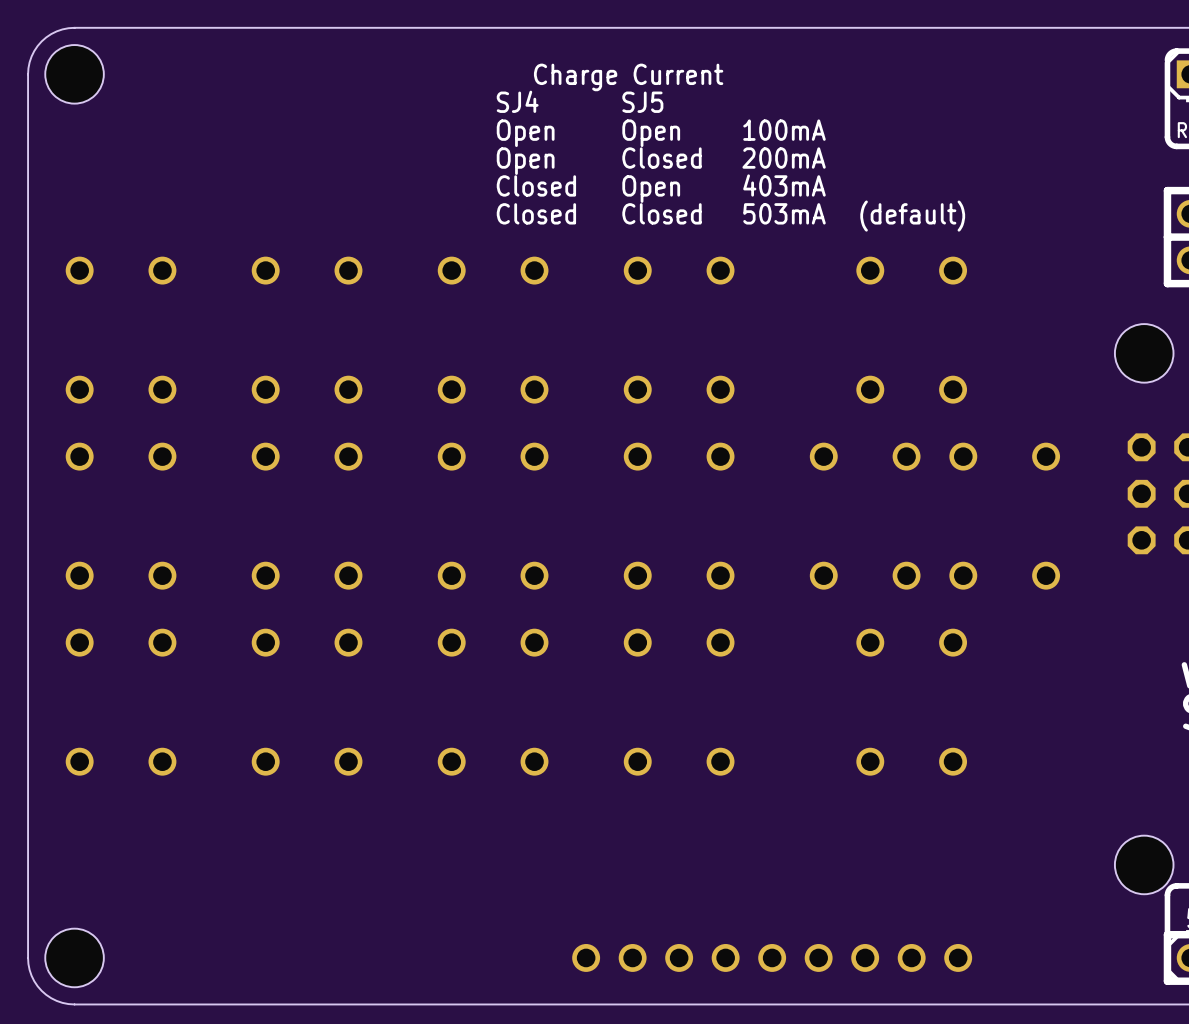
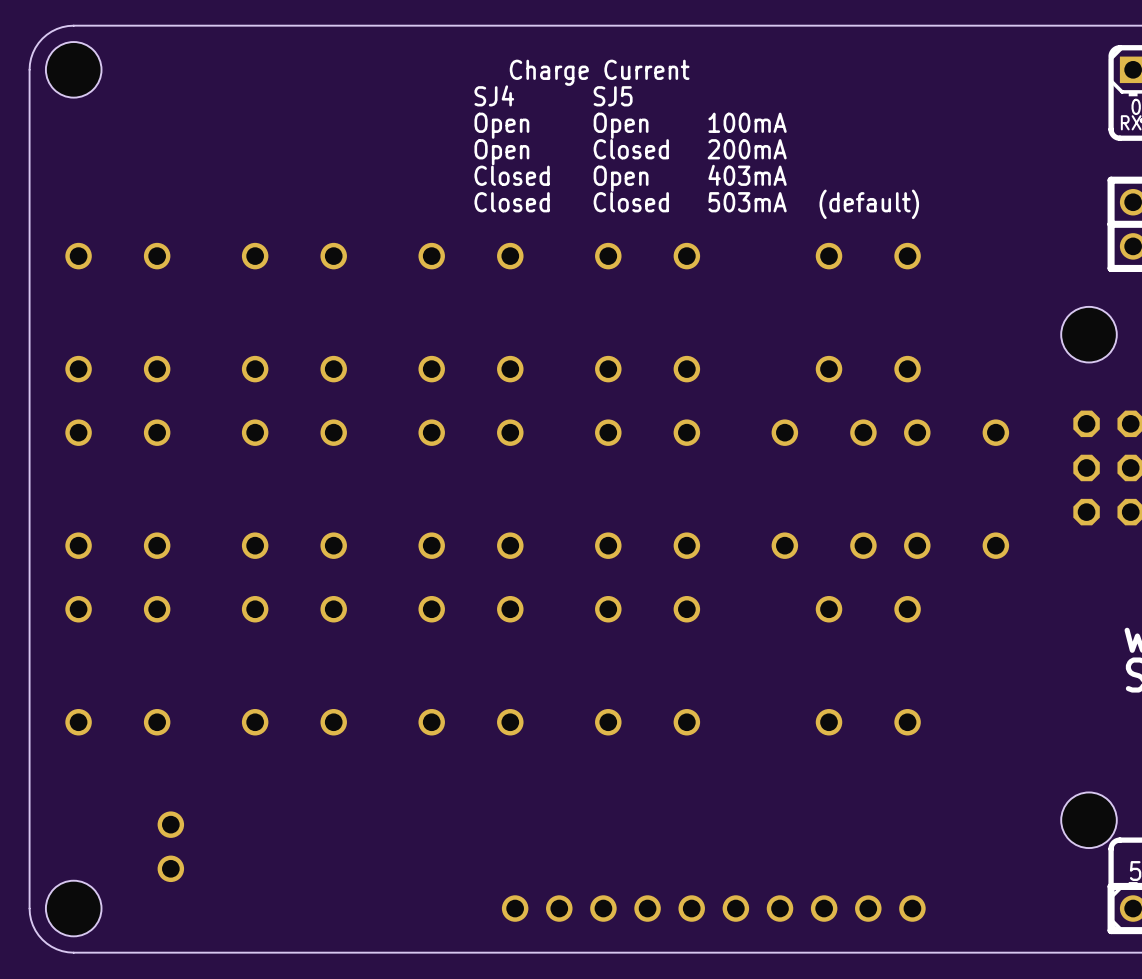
part: none -> (170, 846)
part: none -> (515, 908)

